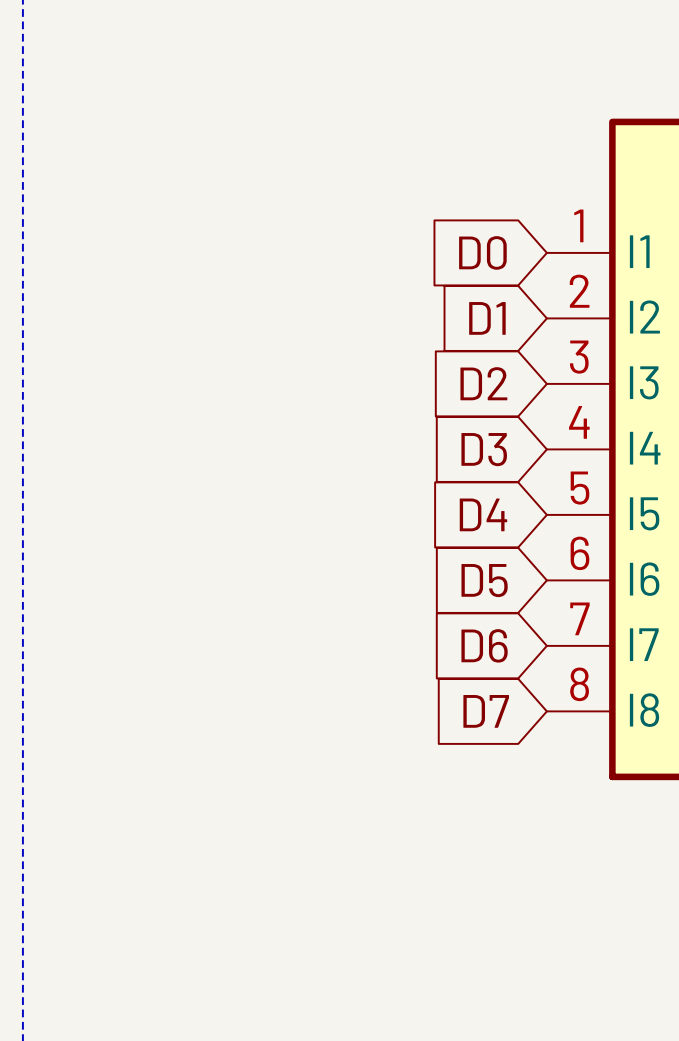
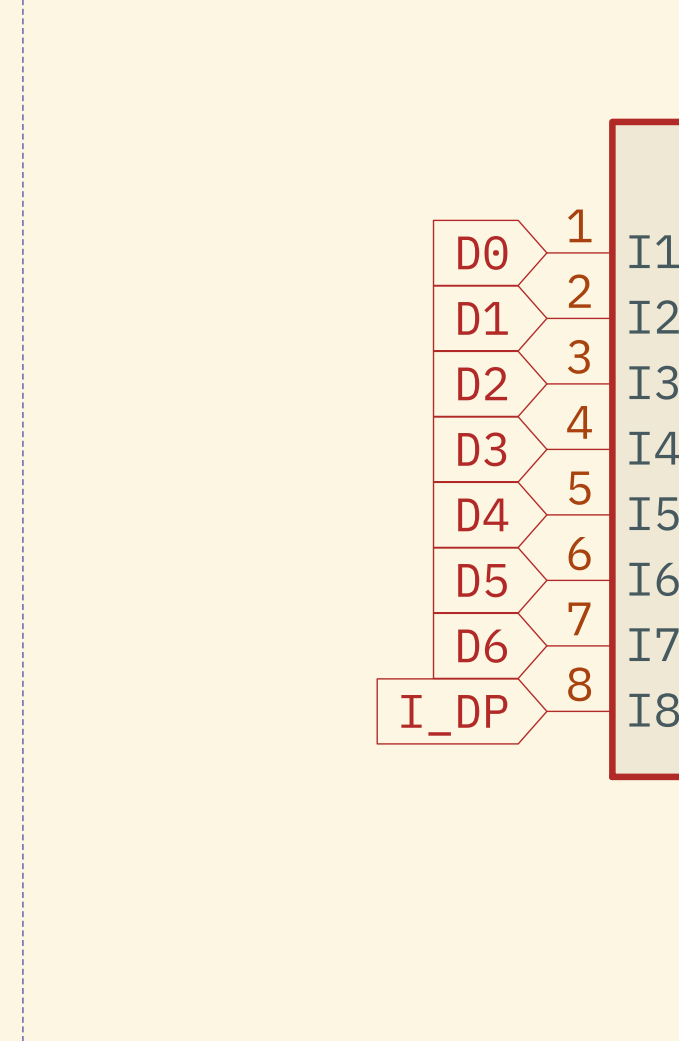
global label: D7 (486, 711) -> I_DP (454, 715)

